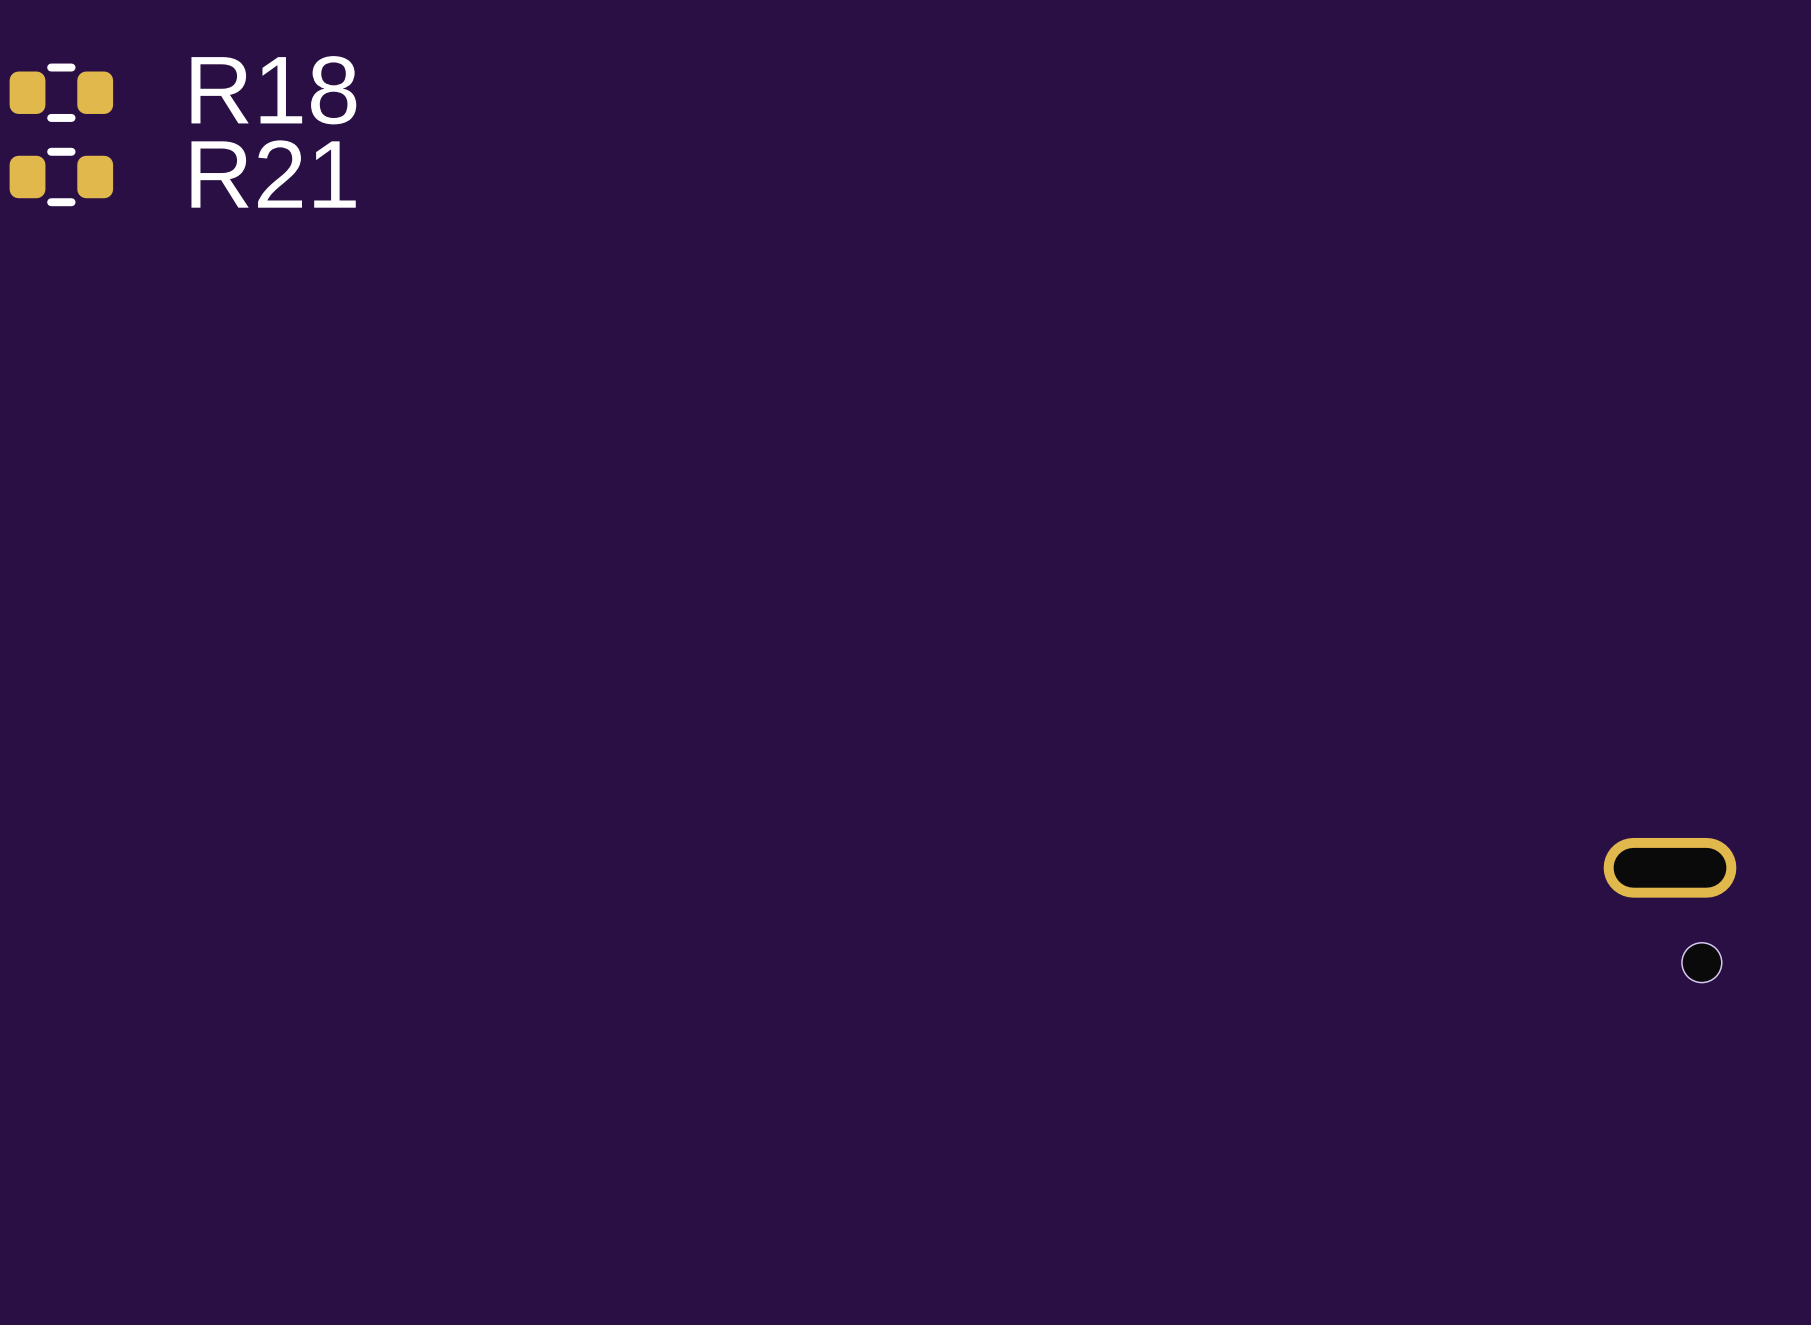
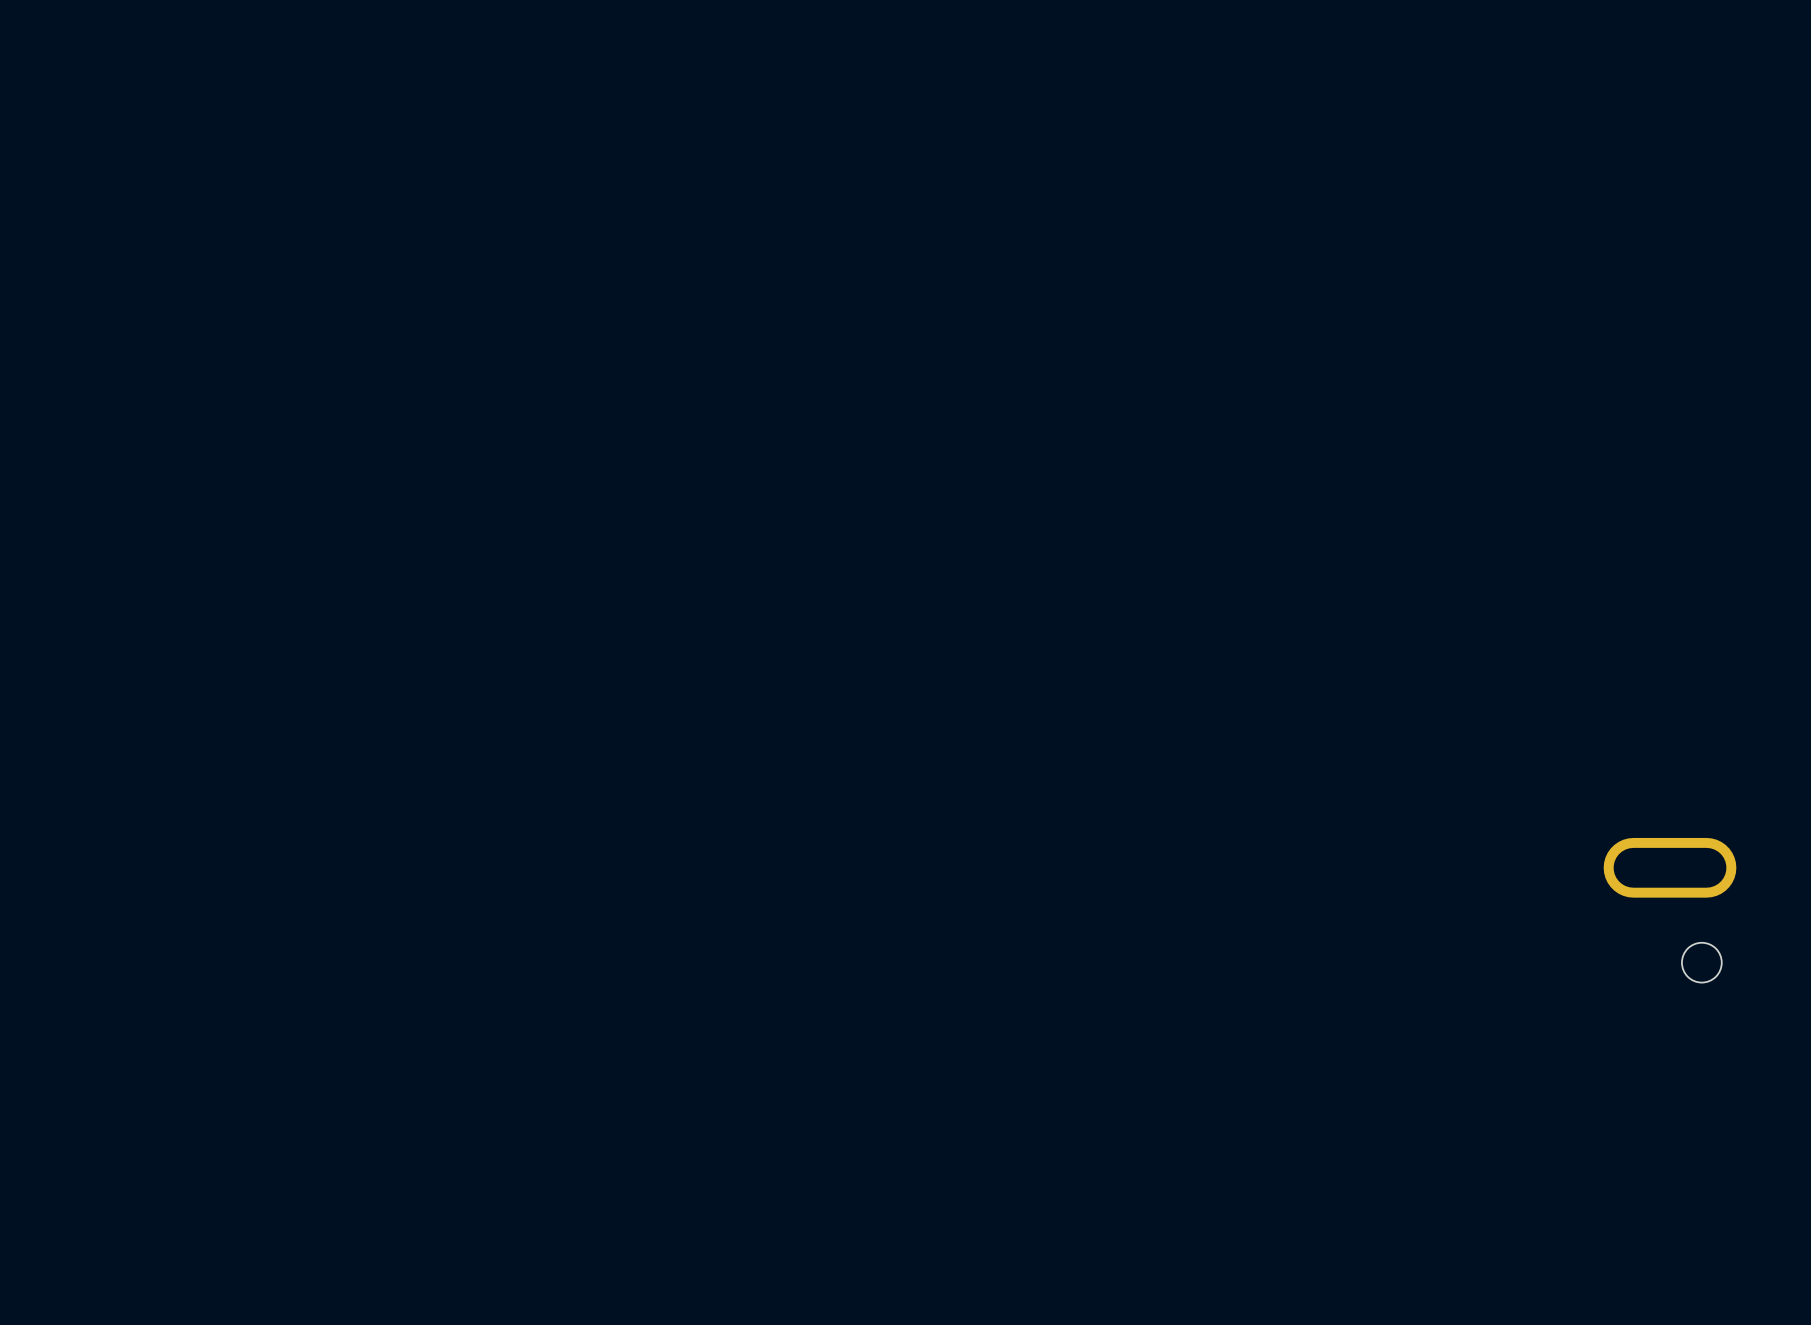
R18: (61, 92) -> none
R21: (61, 177) -> none

